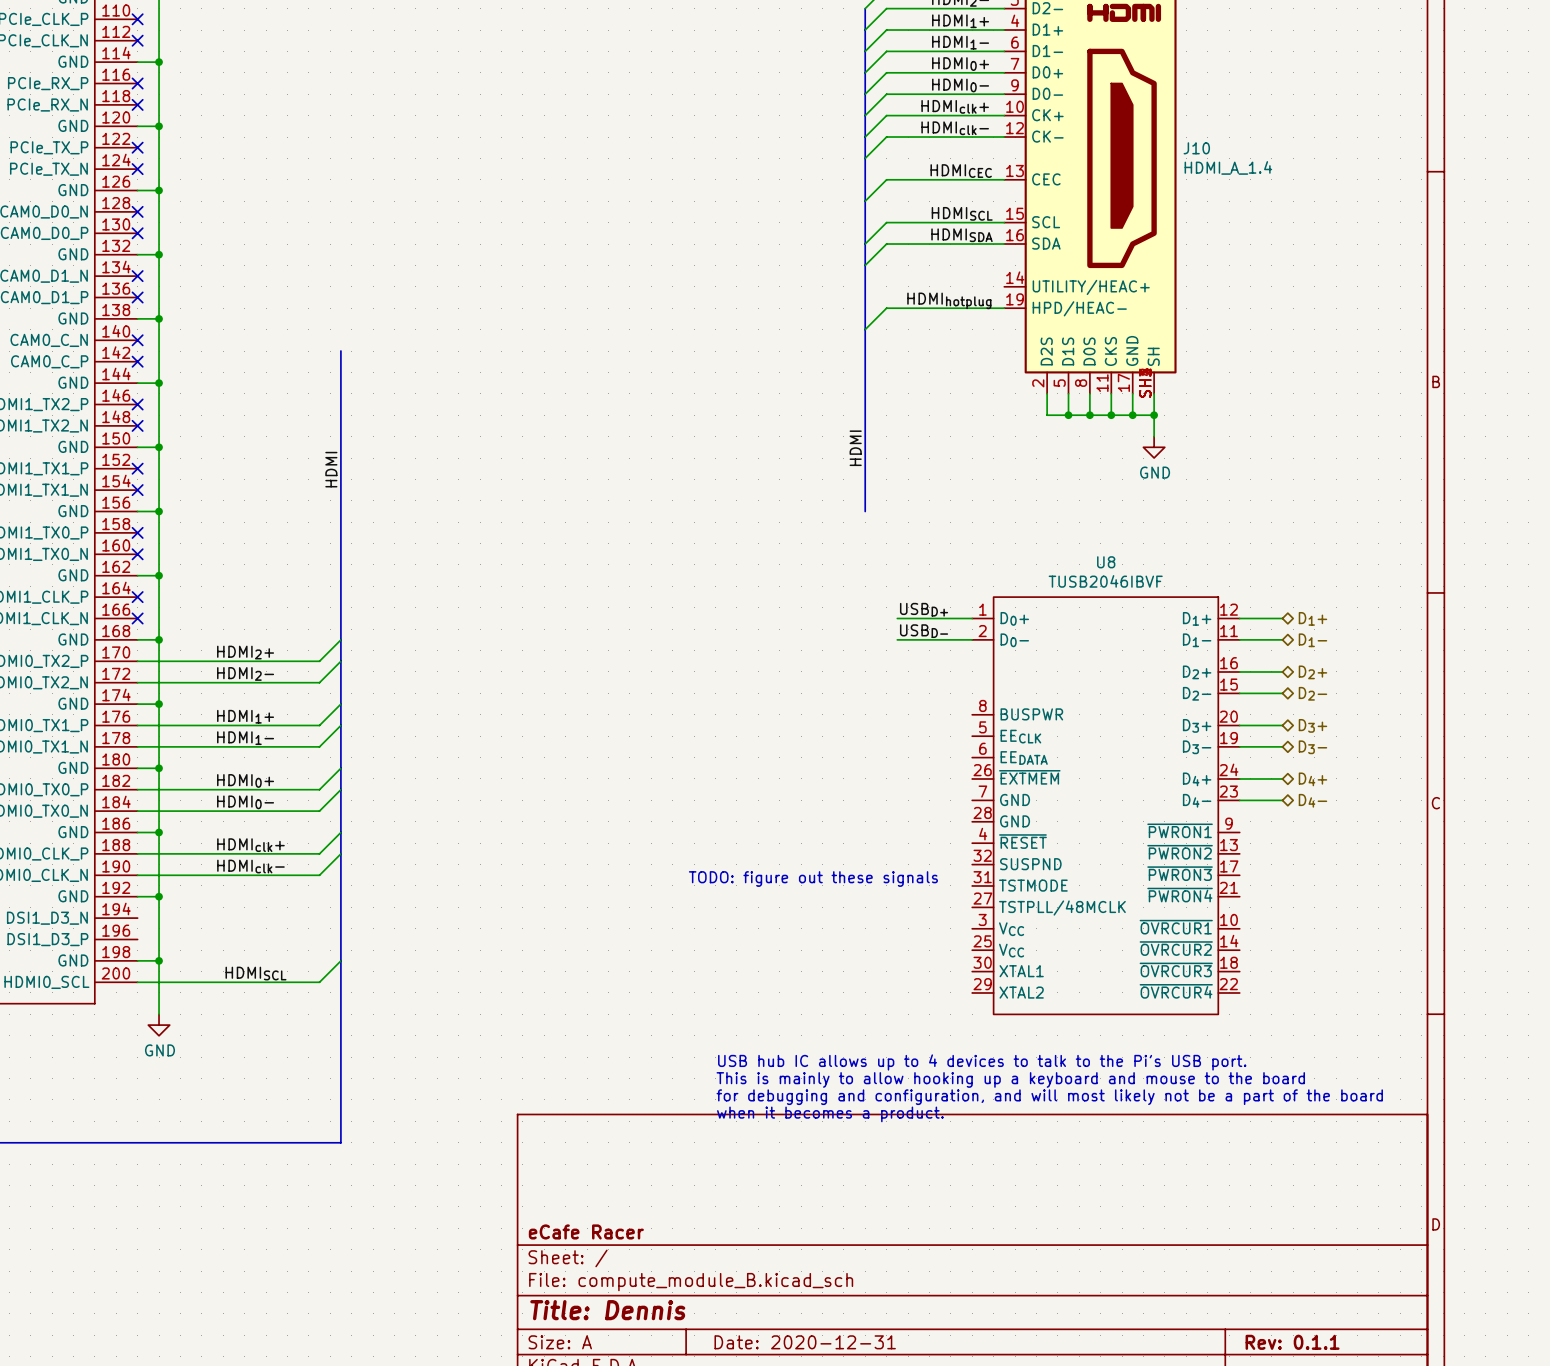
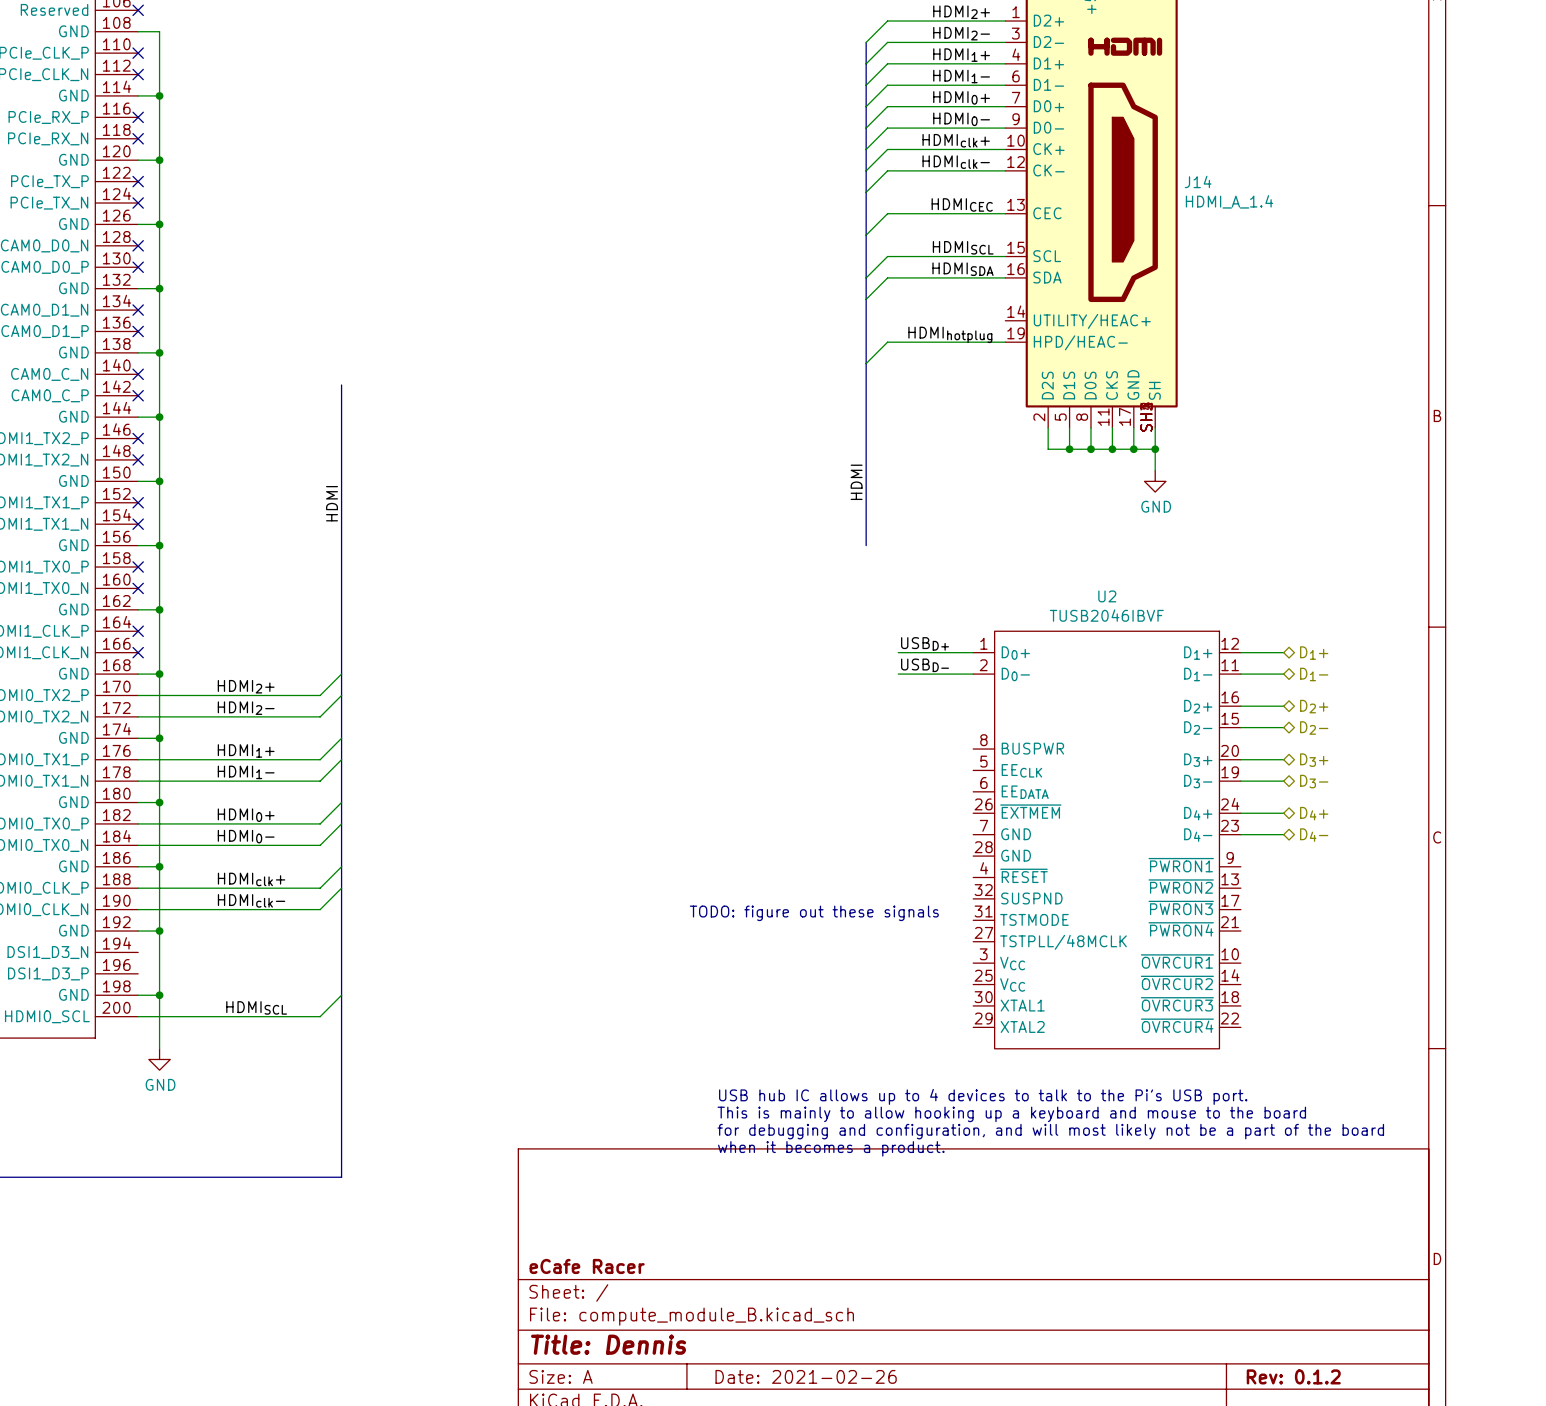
J10 name: J10 (1196, 148) -> J14 (1198, 181)
U8 name: U8 (1106, 562) -> U2 (1107, 596)
title block: Date: 2020-12-31 (805, 1342) -> Date: 2021-02-26 (806, 1376)
title block: Rev: 0.1.1 (1292, 1342) -> Rev: 0.1.2 (1293, 1376)

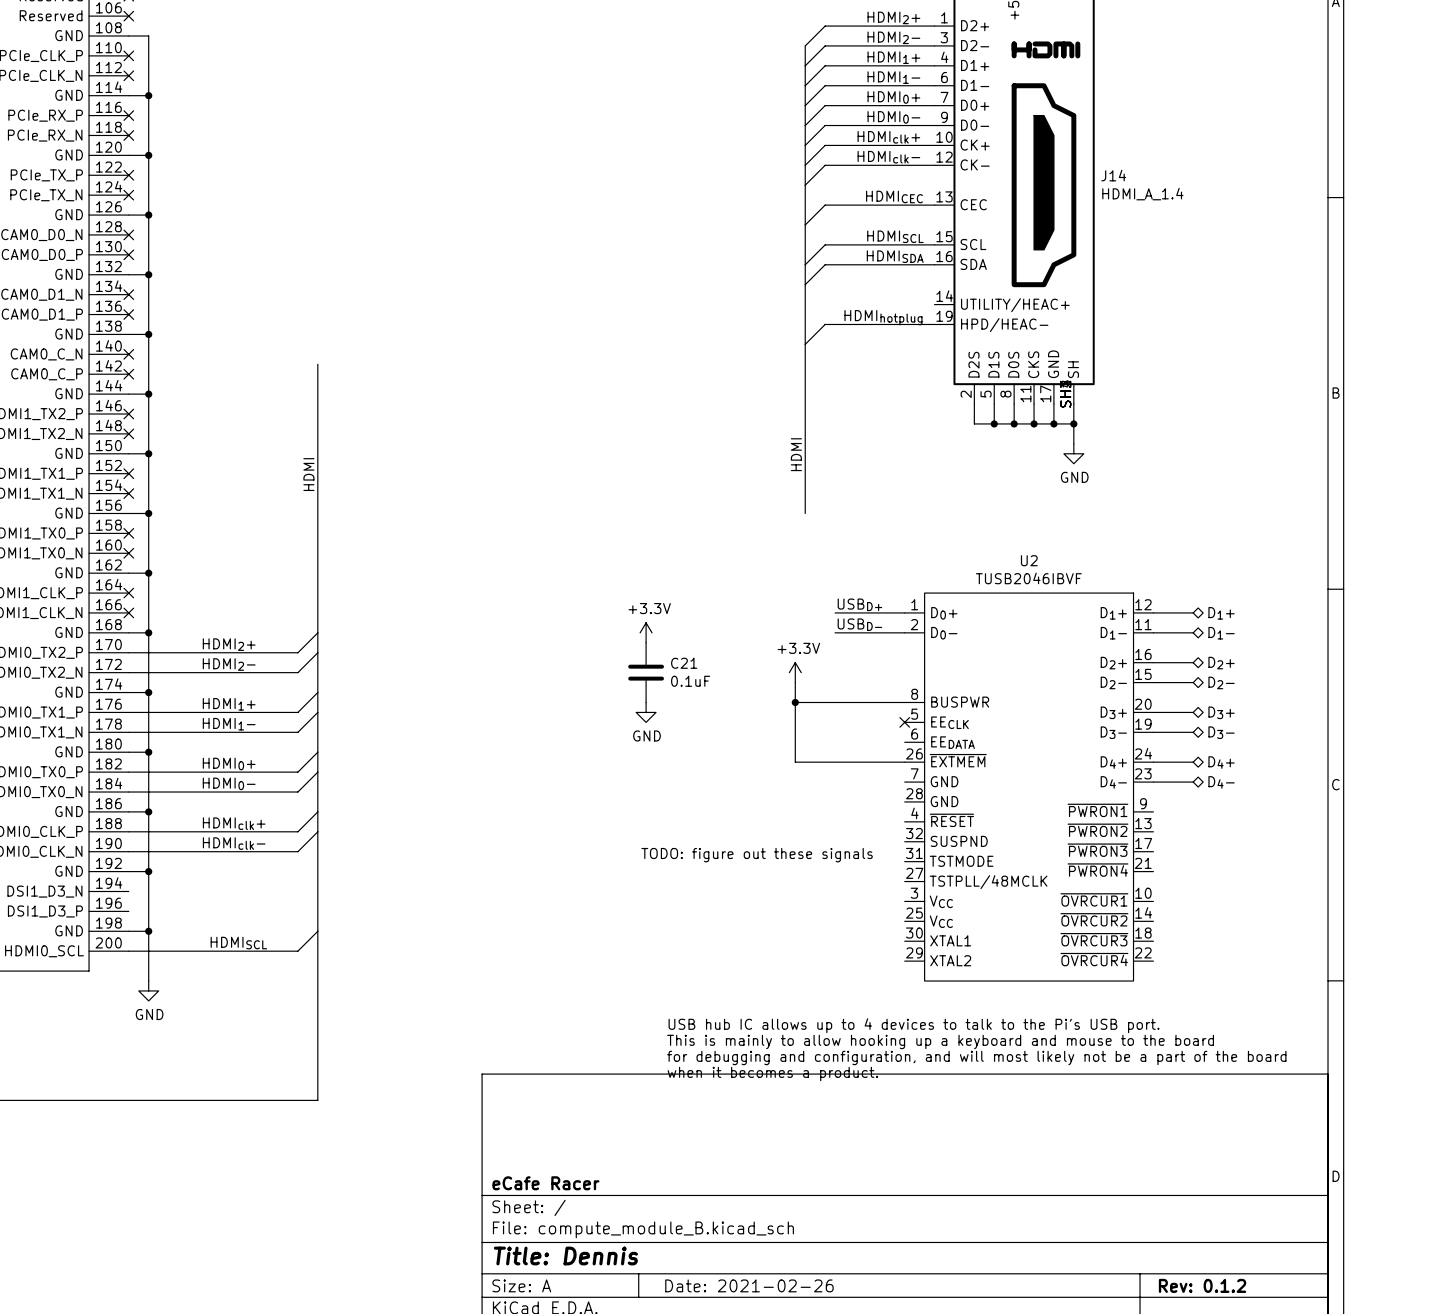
power symbol: none -> +3.3V (646, 632)
C21: none -> 0.1uF (646, 672)
power symbol: none -> +3.3V (795, 672)
wire: none -> (795, 682) (795, 762) (904, 762)
wire: none -> (795, 702) (904, 702)
junction: none -> (795, 702)
power symbol: none -> GND (646, 712)
no-connect mark: none -> (904, 722)

